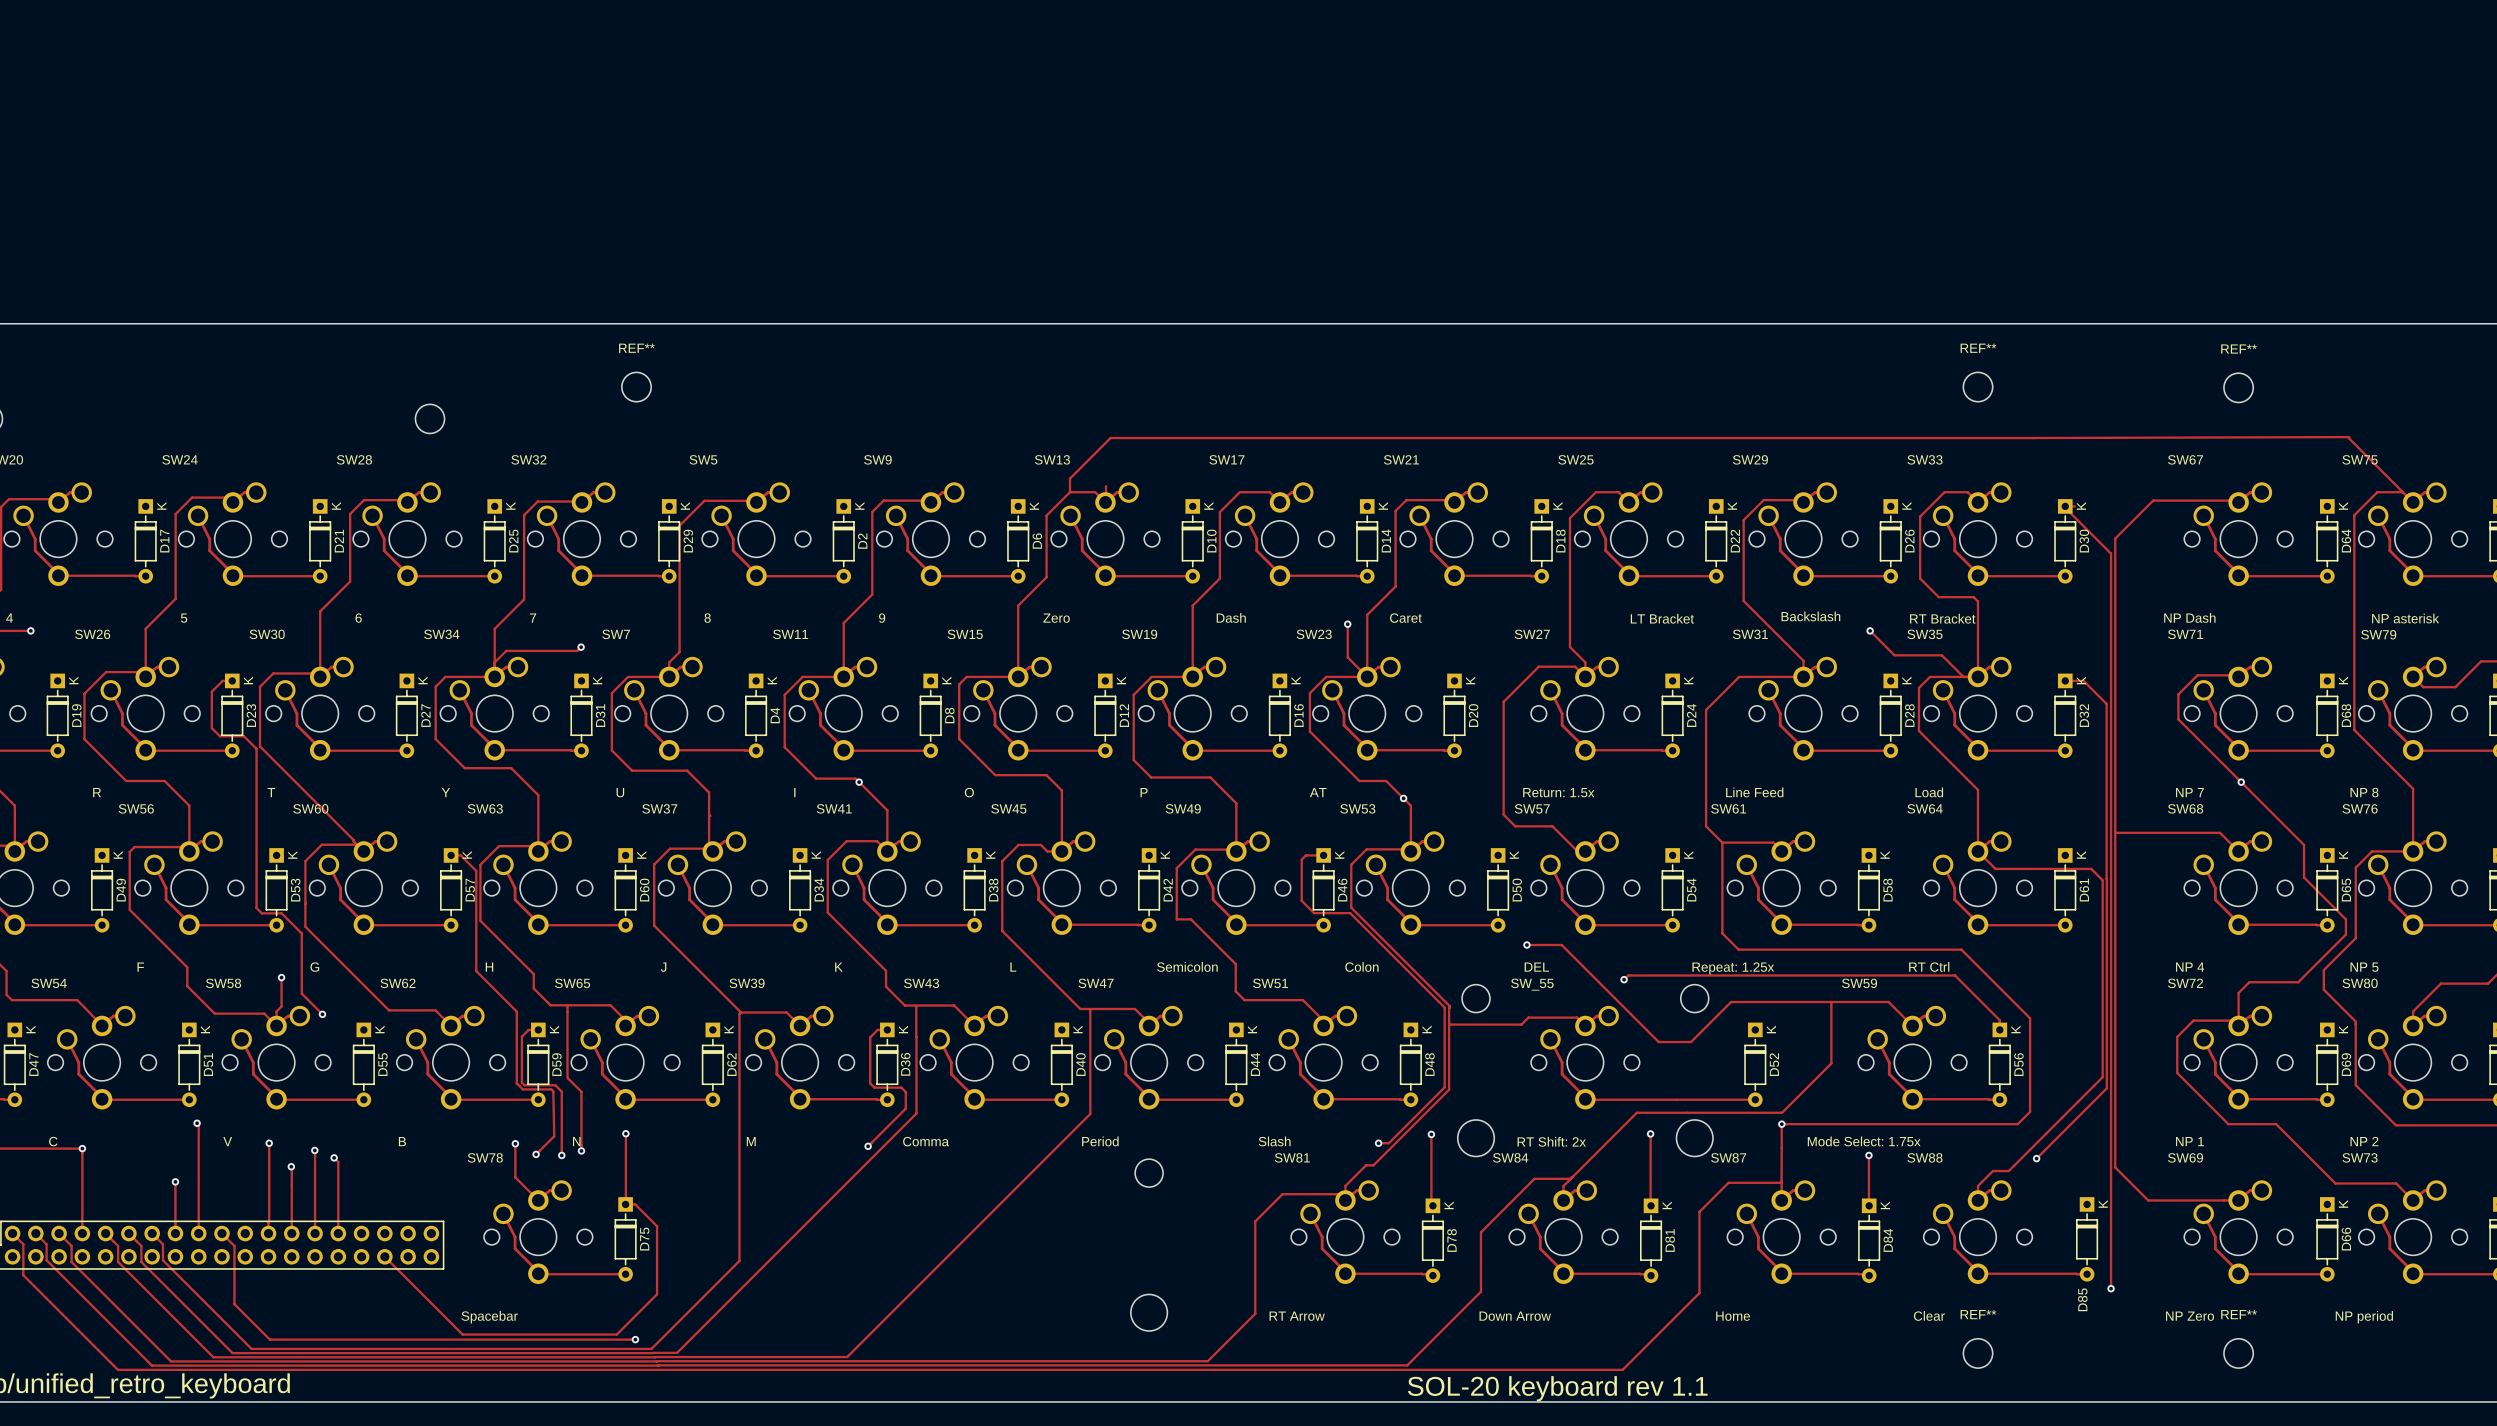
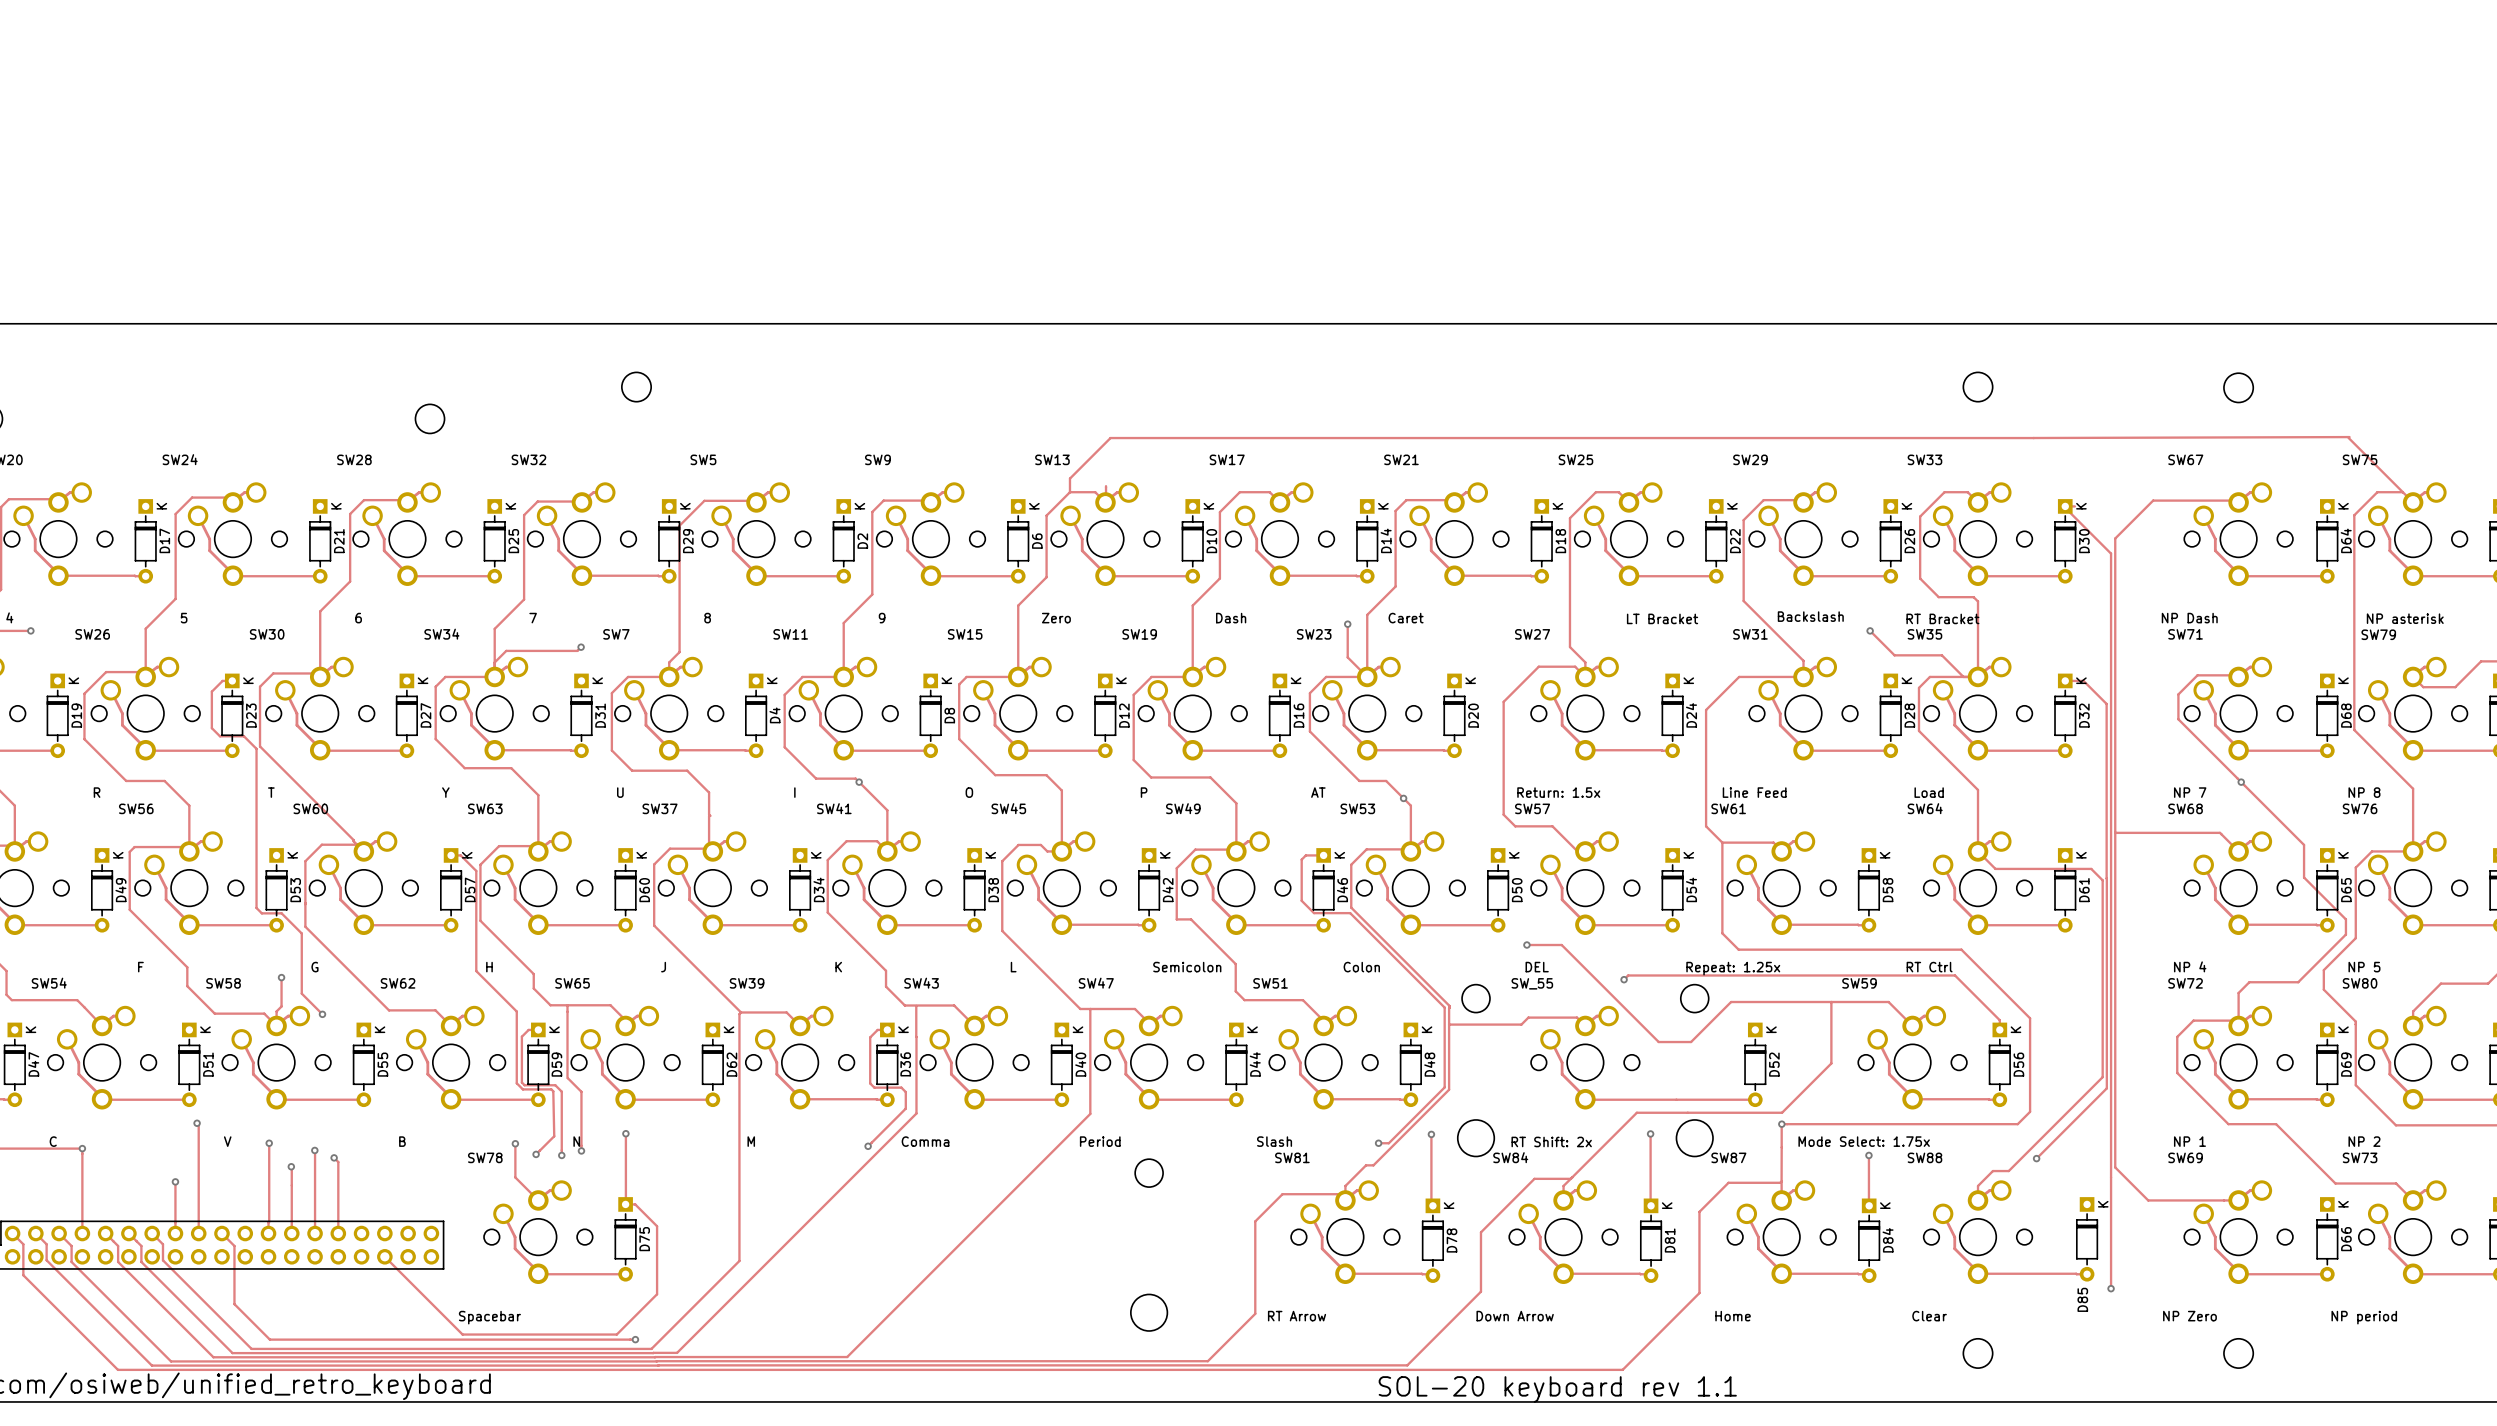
REF** name: REF** (636, 348) -> none
REF** name: REF** (1978, 348) -> none
REF** name: REF** (2239, 349) -> none
REF** name: REF** (1978, 1314) -> none
REF** name: REF** (2239, 1314) -> none

